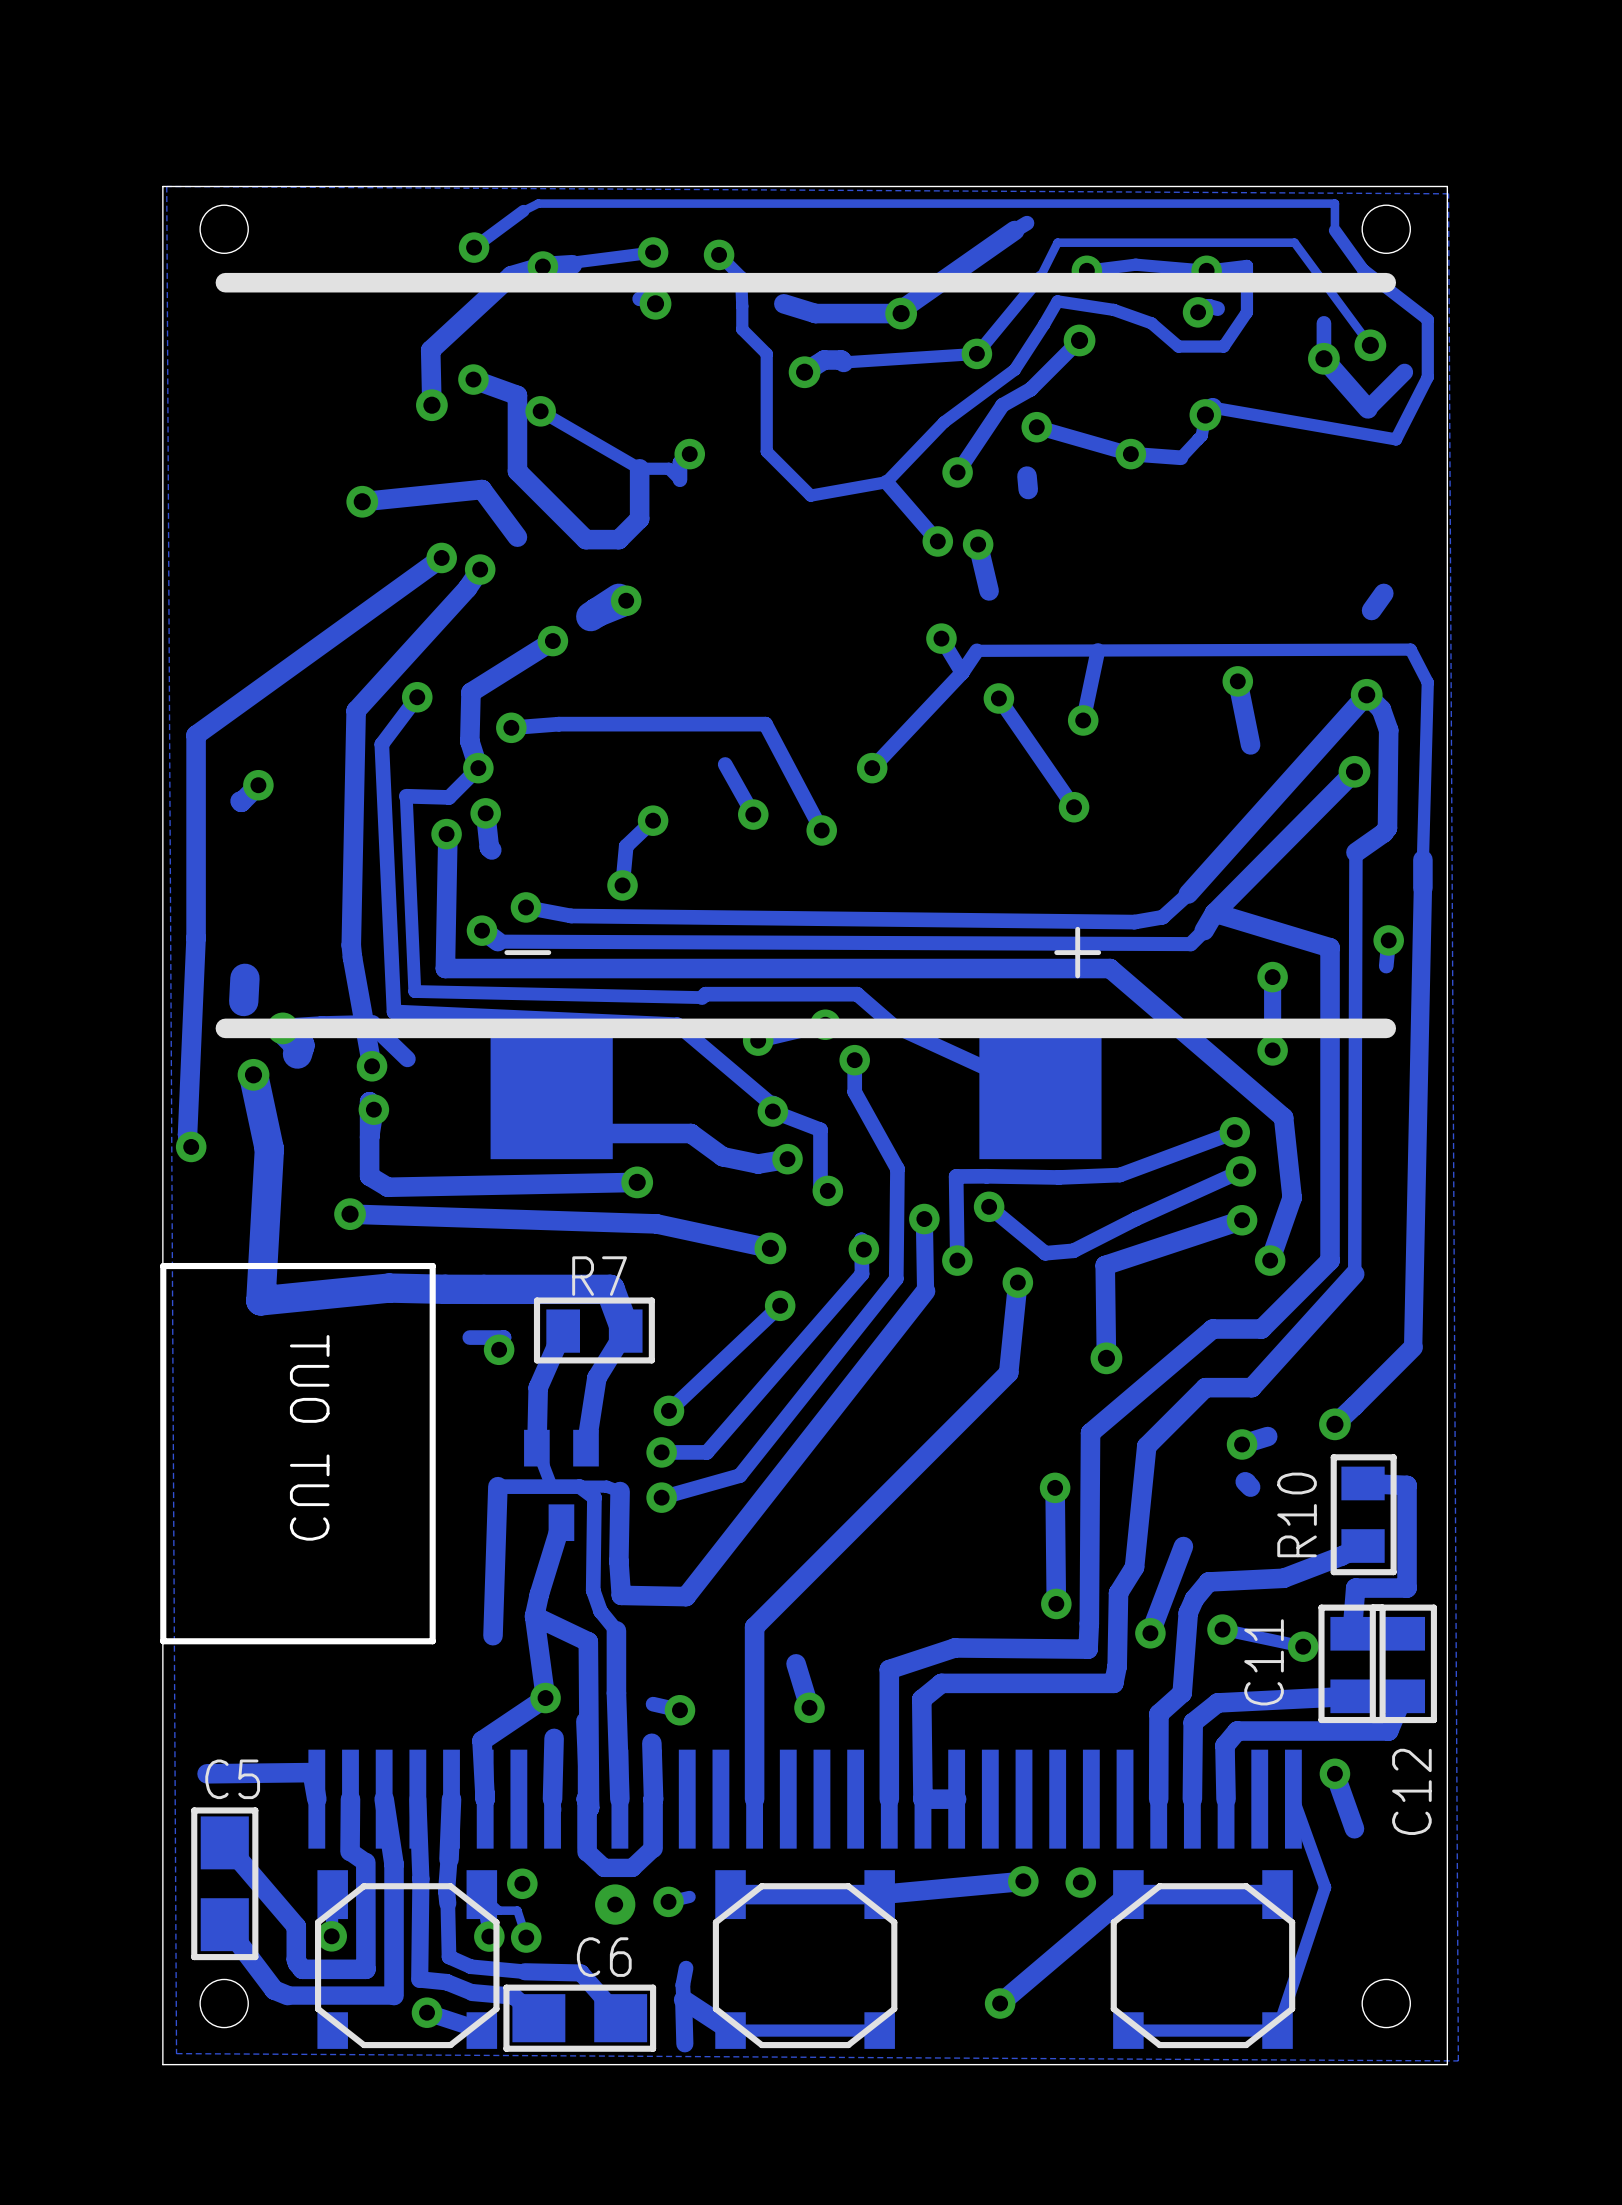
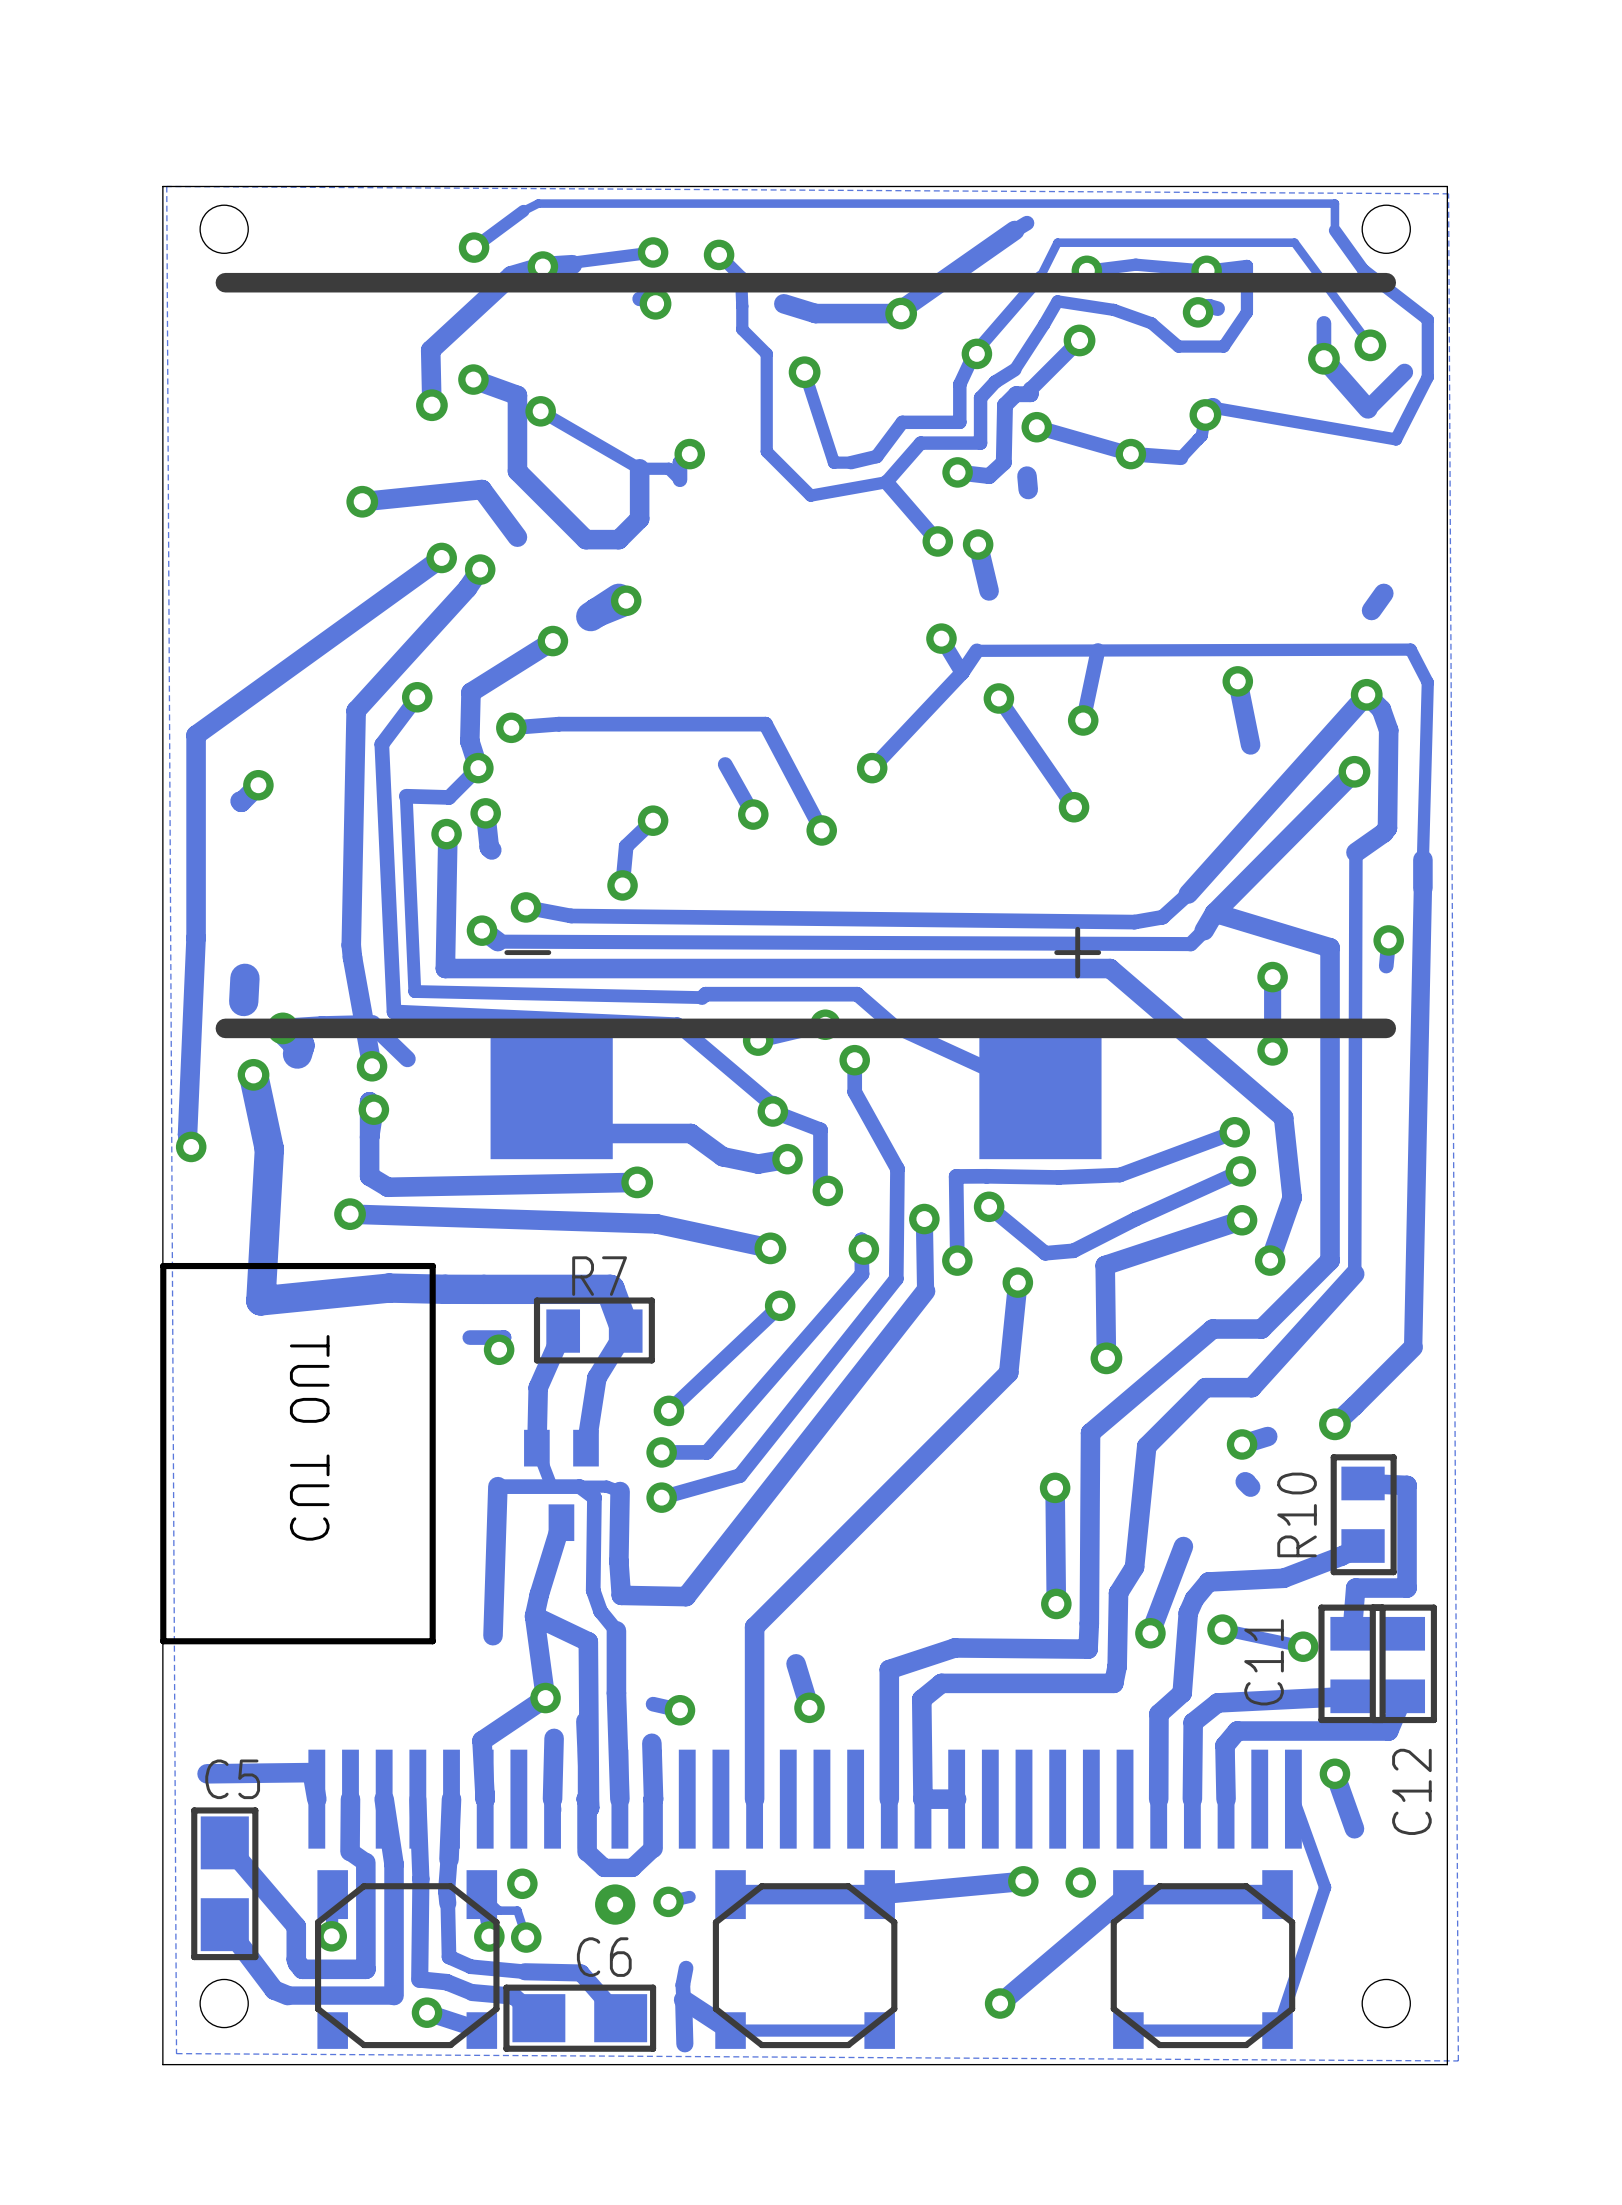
track: (1040, 276) (976, 353) (843, 362) (841, 360) (824, 360) (804, 372) -> (1040, 276) (974, 353) (959, 384) (959, 422) (902, 422) (876, 456) (851, 462) (833, 462) (804, 372)
track: (1014, 369) (943, 422) (886, 482) -> (1014, 369) (995, 382) (980, 397) (980, 443) (920, 443) (886, 482)
track: (1030, 389) (1002, 405) (957, 472) -> (1030, 389) (1030, 394) (1016, 394) (1005, 405) (1003, 462) (989, 476) (957, 472)

